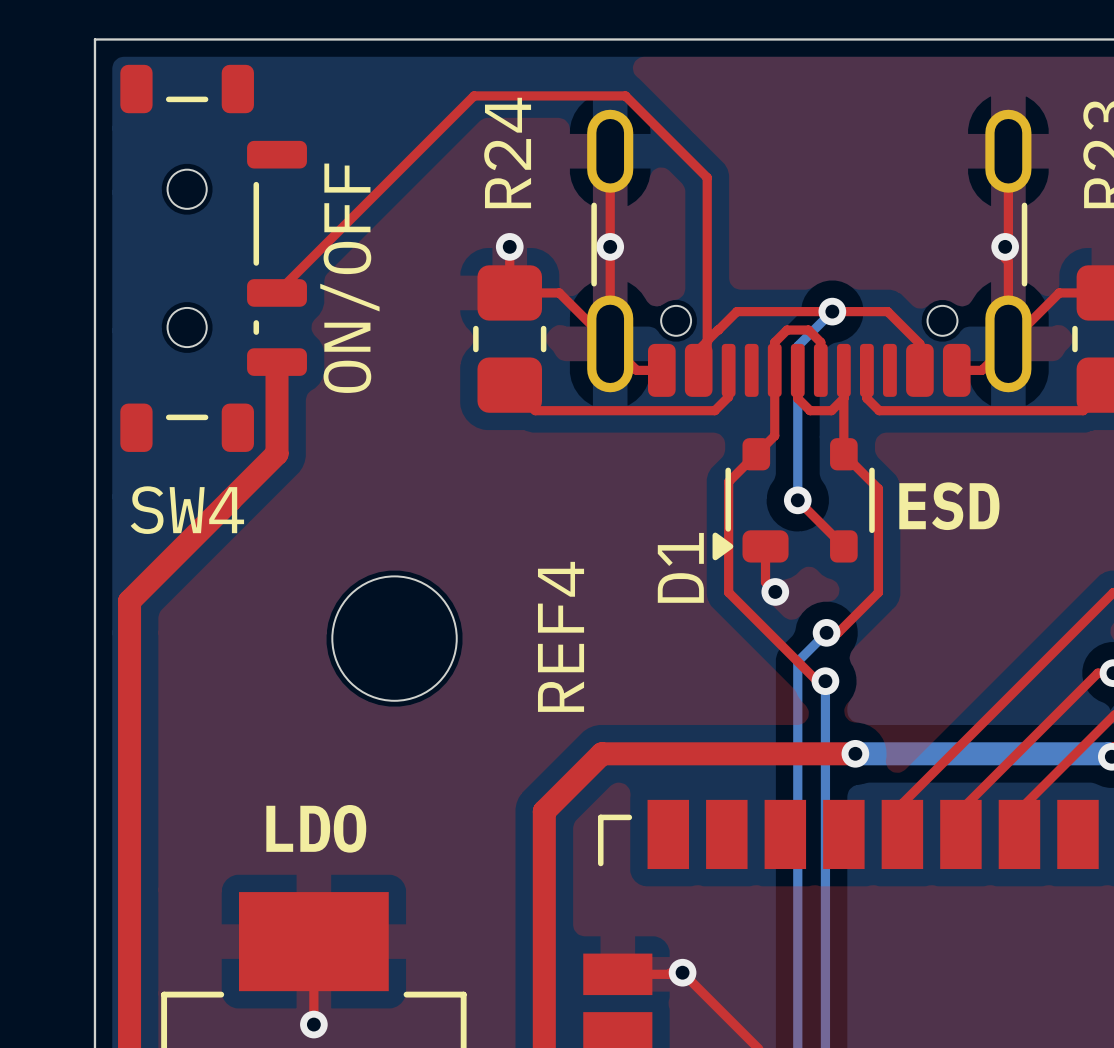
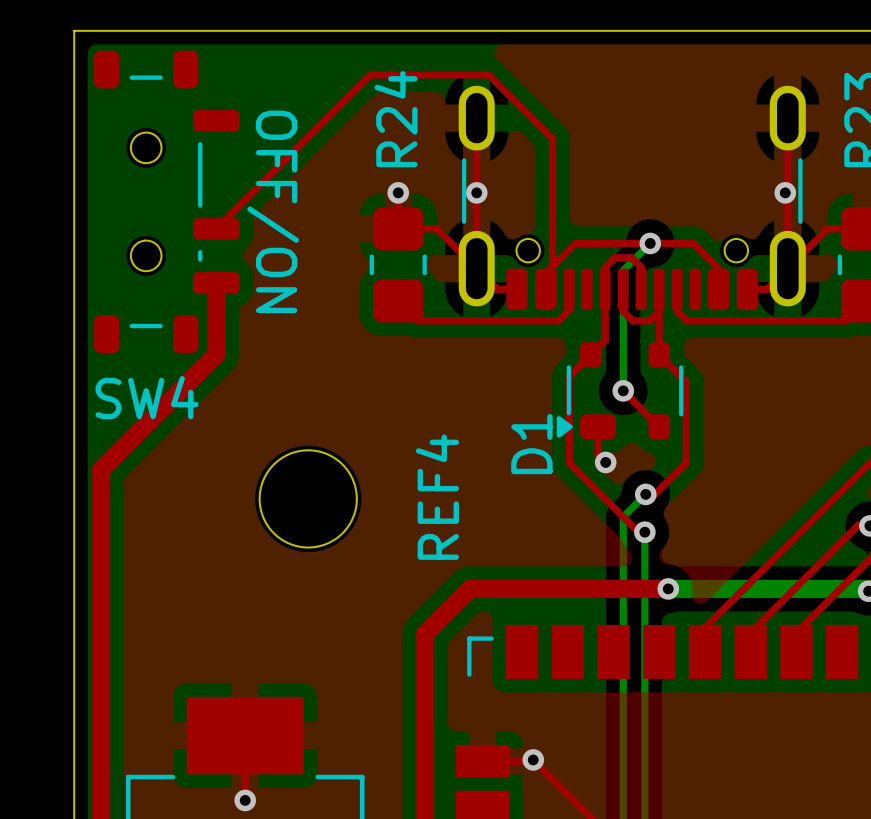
text: none -> OFF/ON (273, 211)
text: ON/OFF (349, 278) -> none
text: ESD (949, 506) -> none
text: LDO (316, 828) -> none

